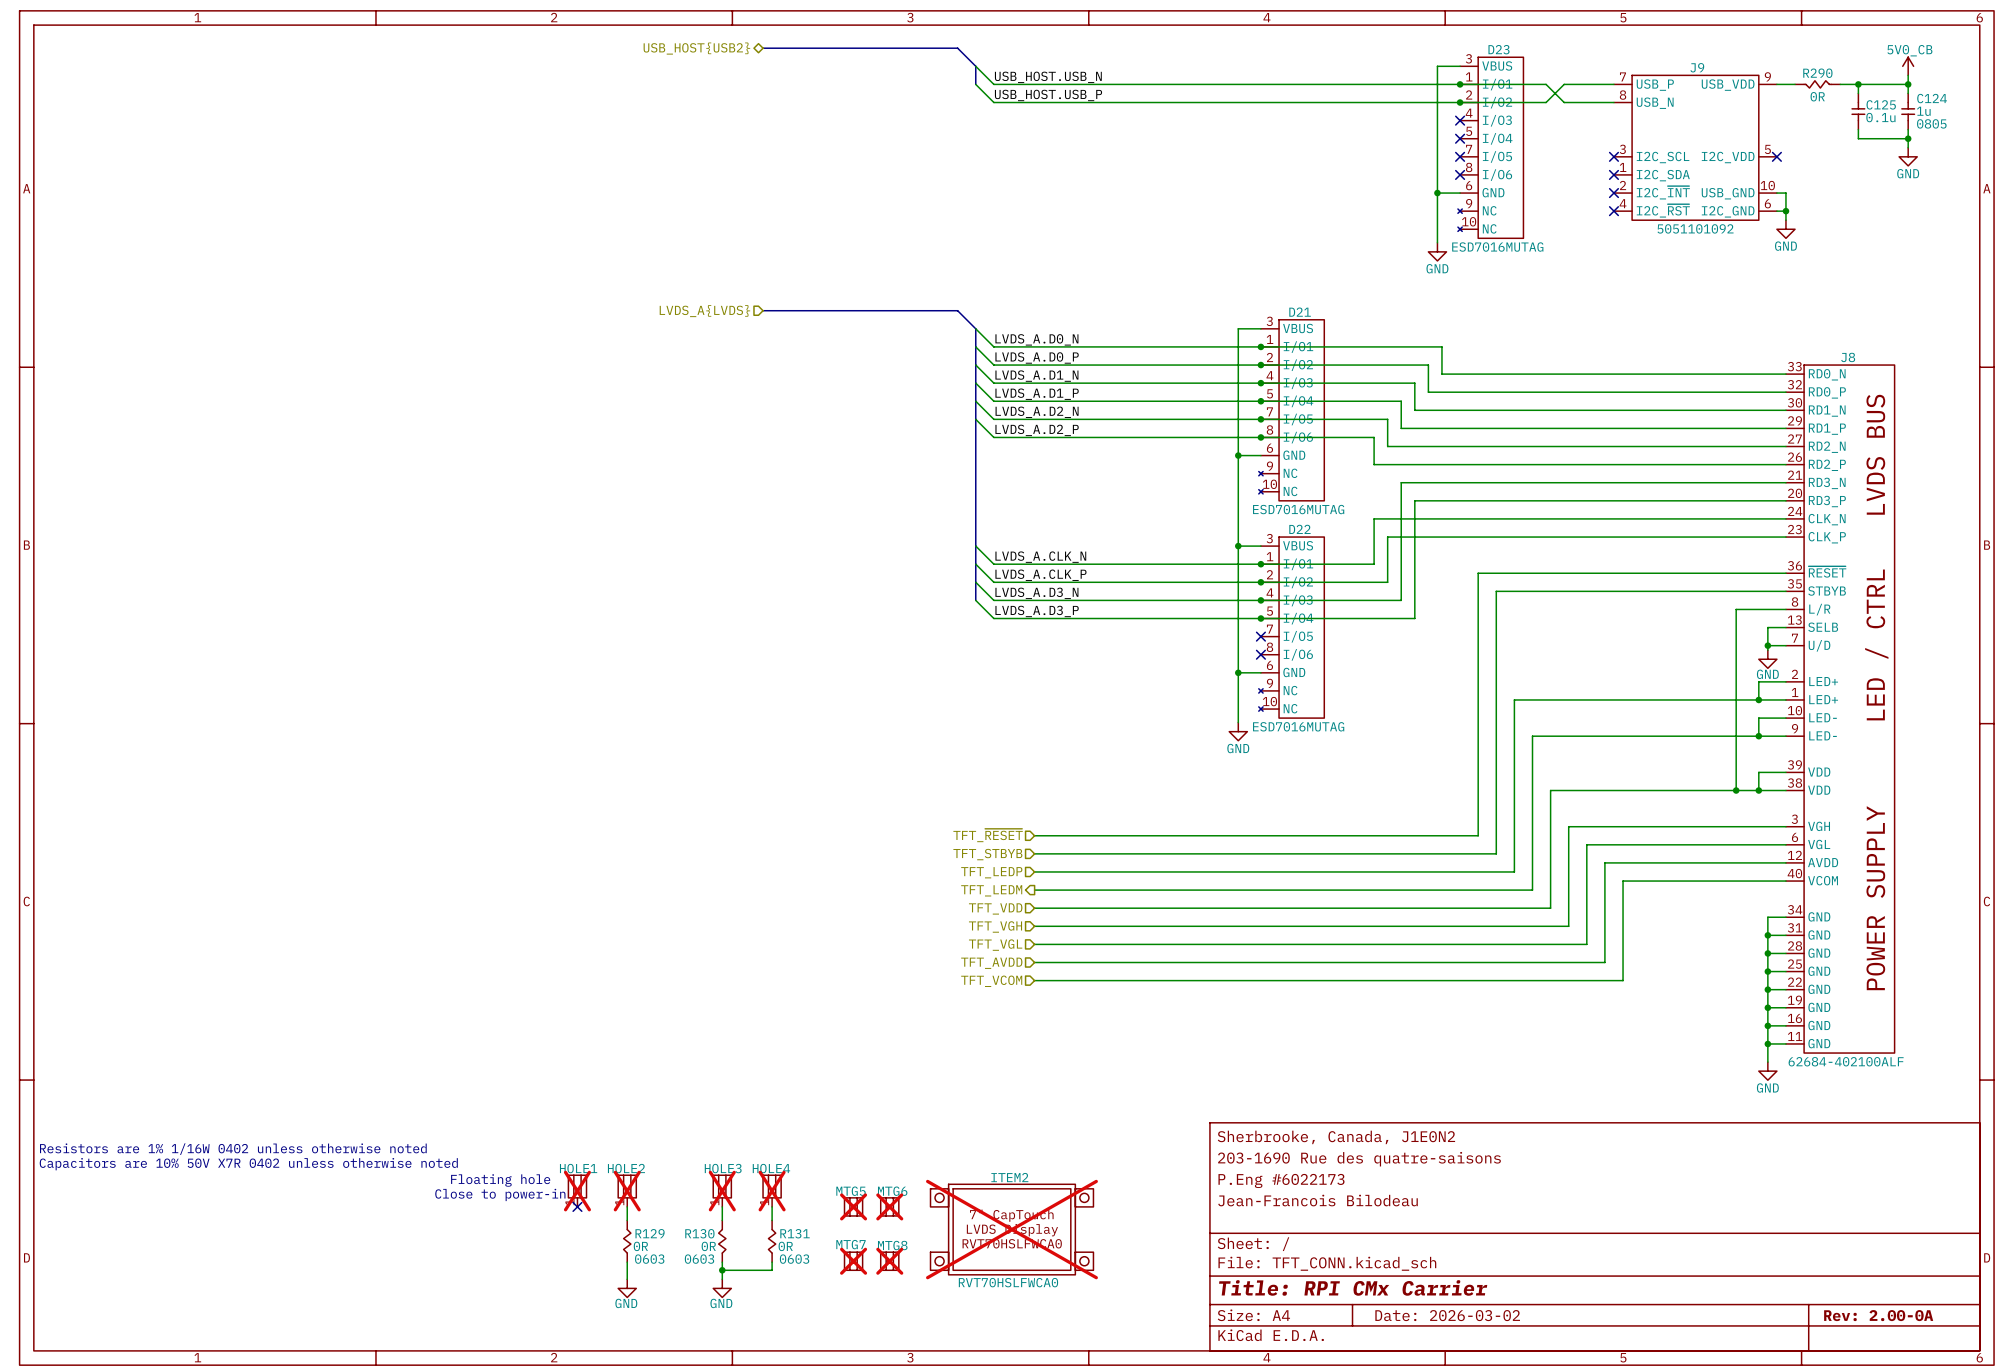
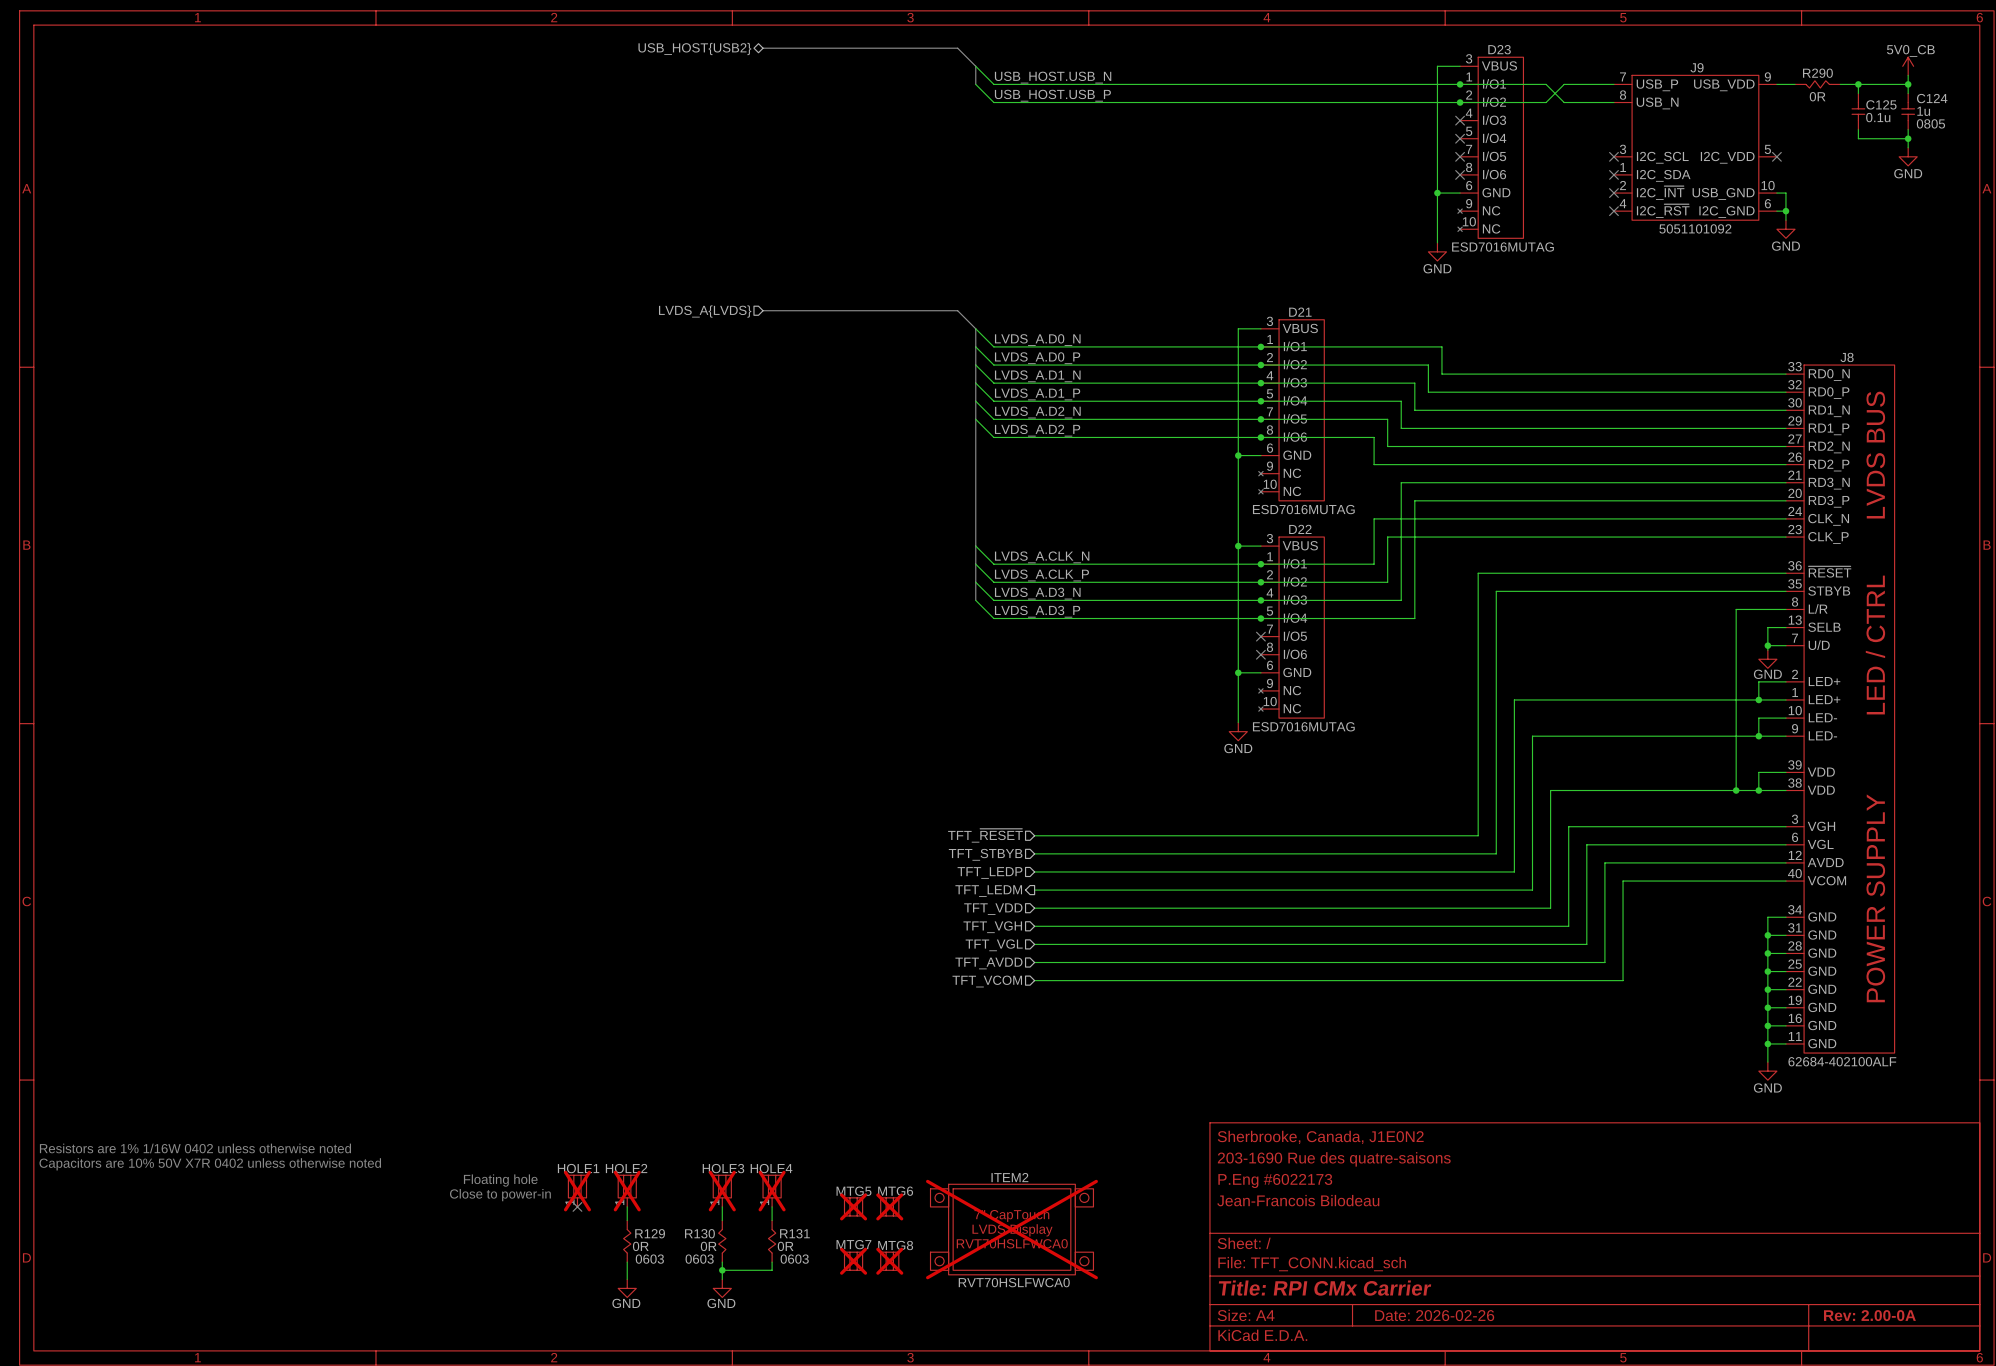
title block: Date: 2026-03-02 (1447, 1315) -> Date: 2026-02-26 (1434, 1315)

